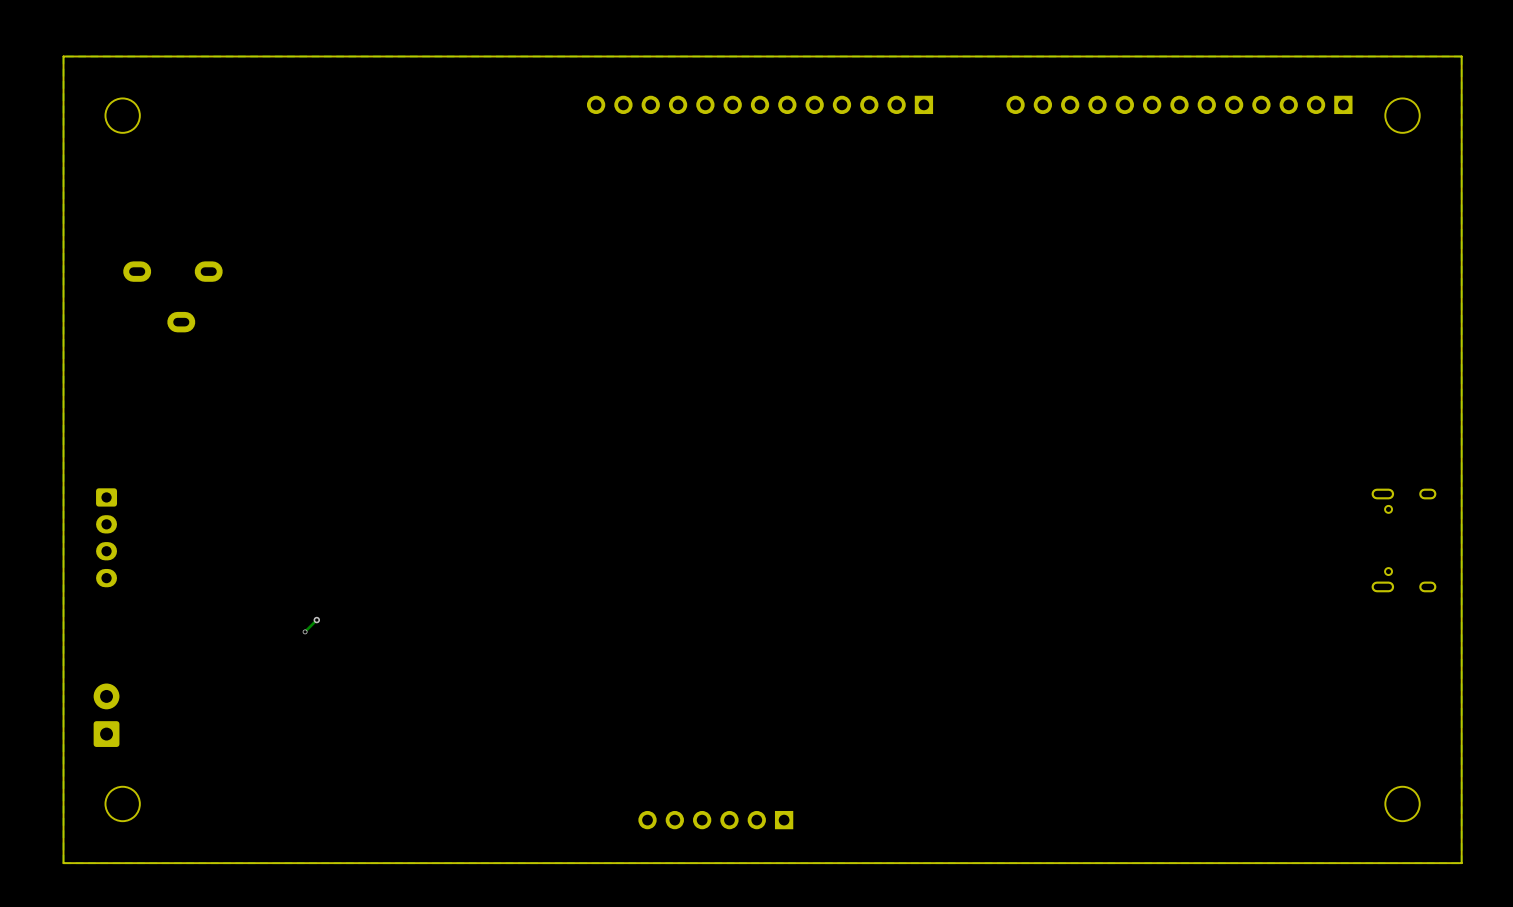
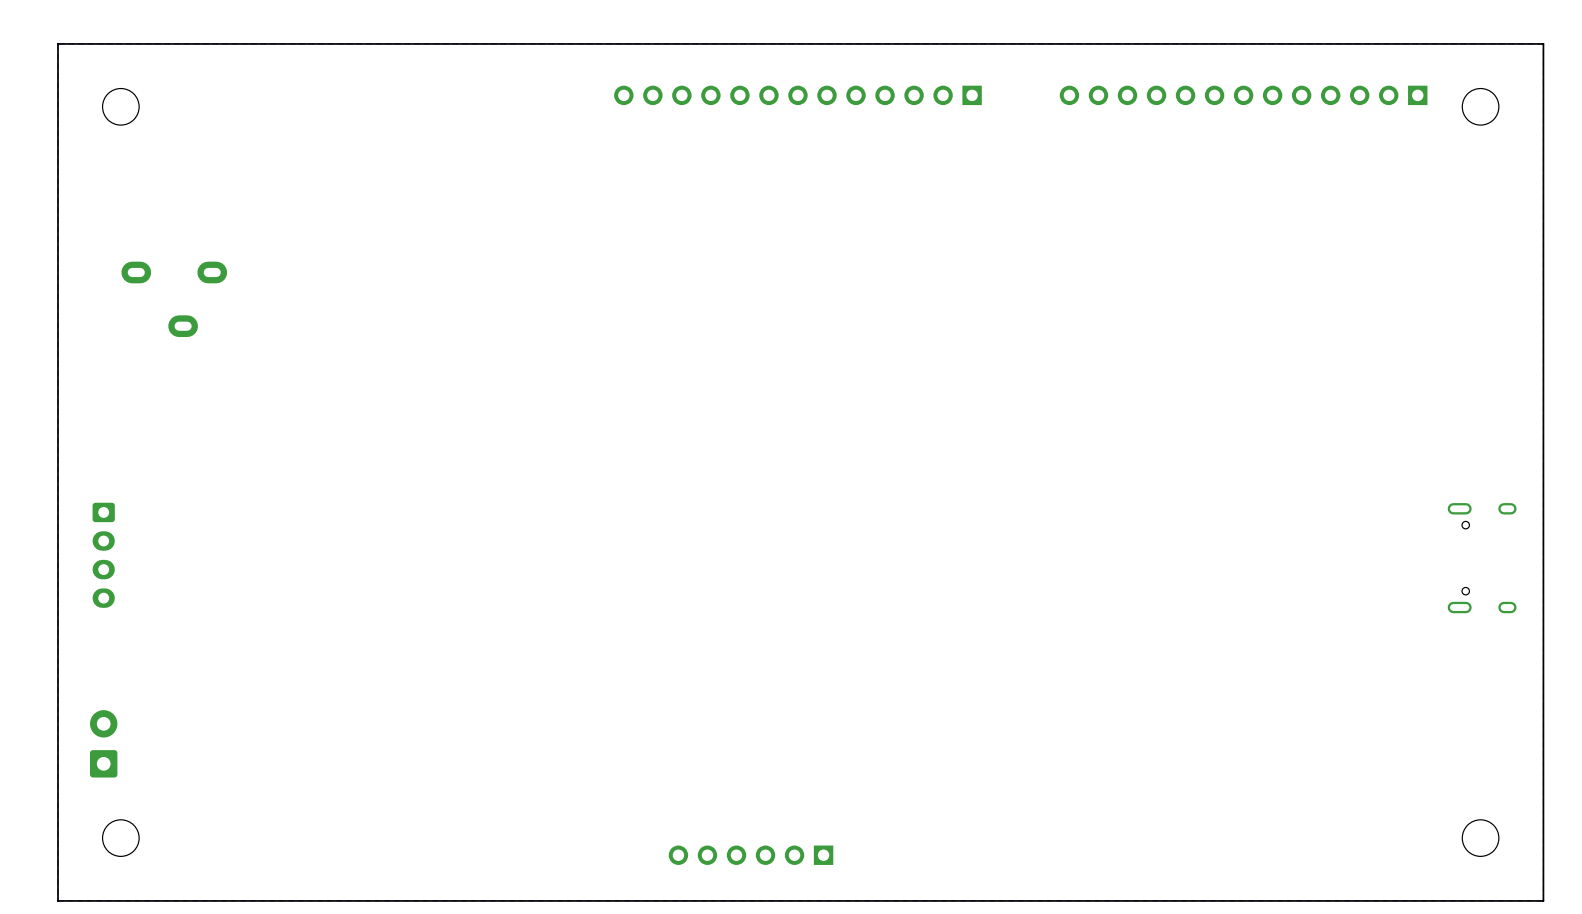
track: (316, 620) (304, 631) -> none
via: (316, 620) -> none
via: (305, 631) -> none

